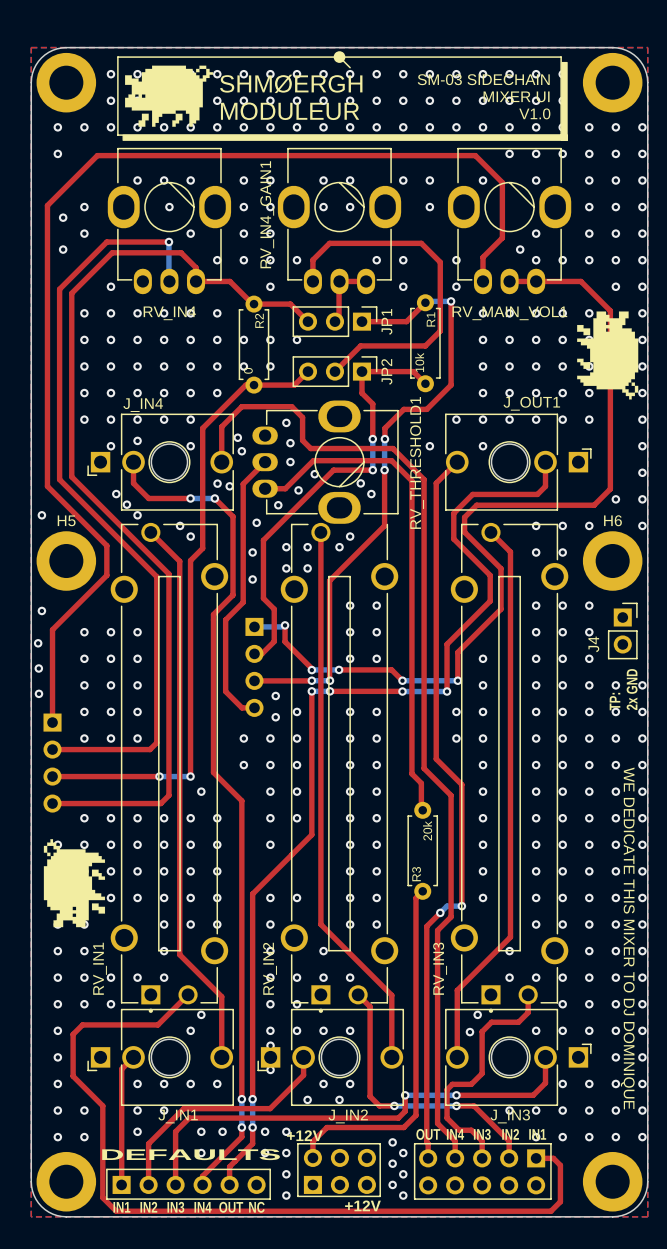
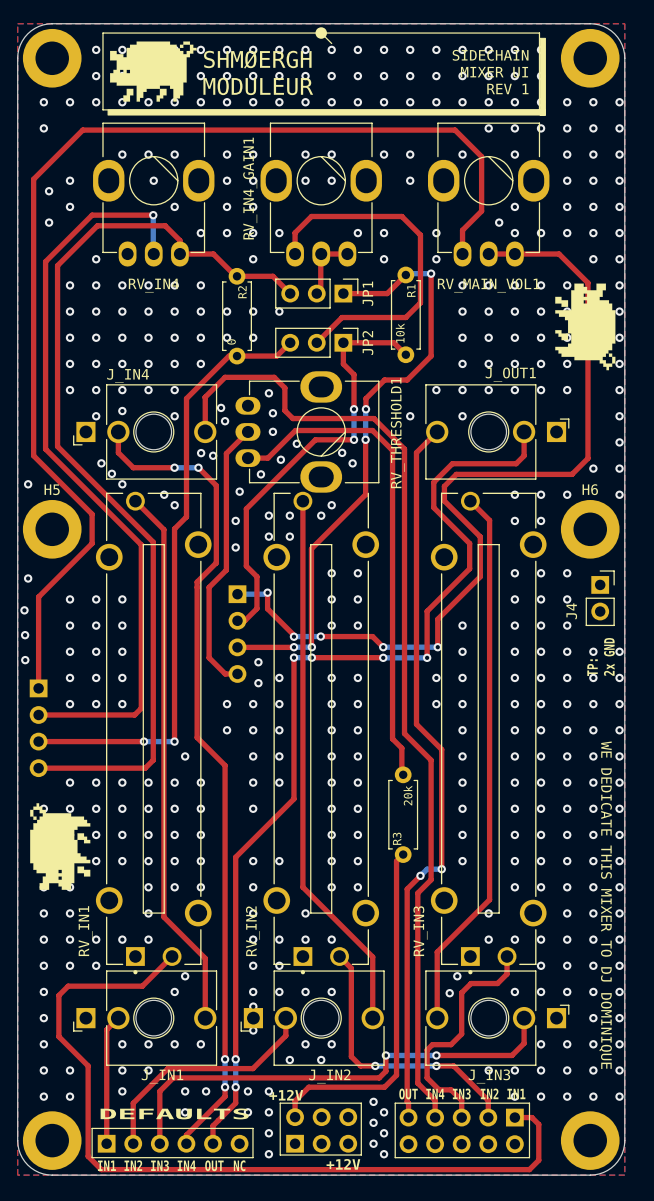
text: SM-03 SIDECHAIN (483, 79) -> SIDECHAIN (490, 55)
text: V1.0 (534, 113) -> REV 1 (507, 89)

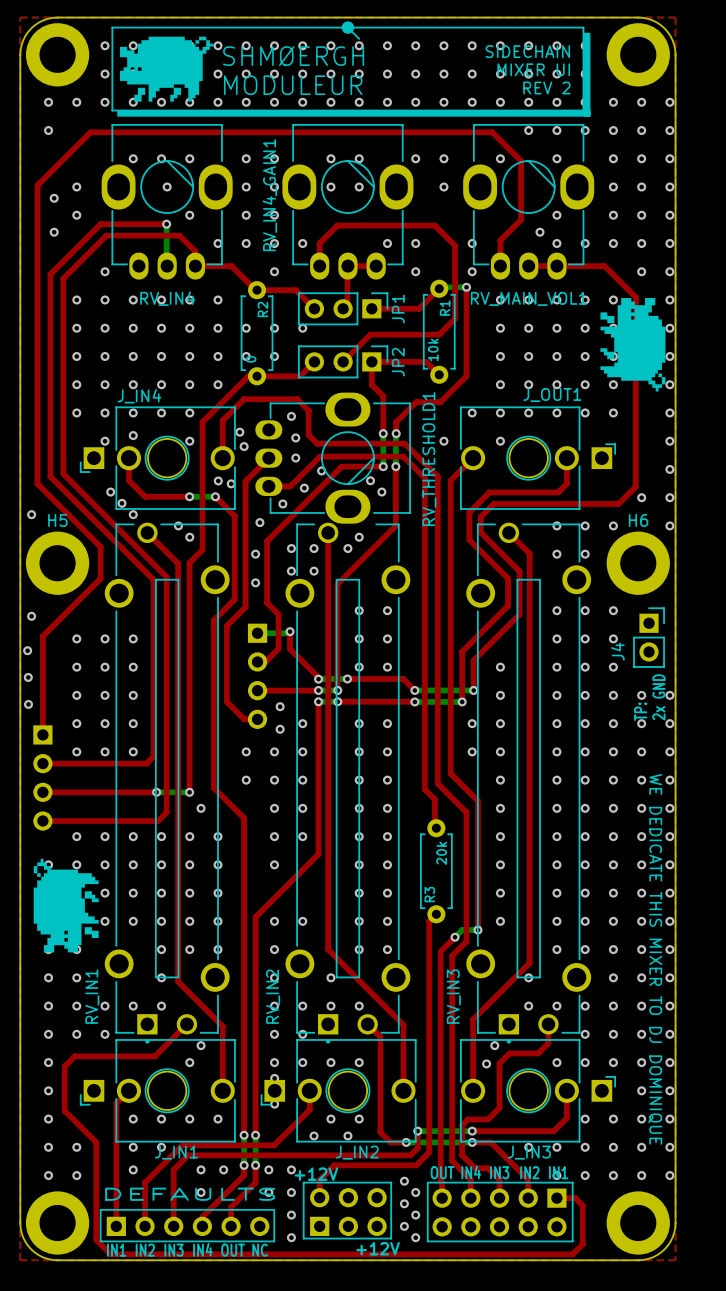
text: REV 1 (507, 89) -> REV 2 (546, 87)
RV_IN2 footprint: [263, 491, 380, 975] -> [285, 522, 411, 1044]

